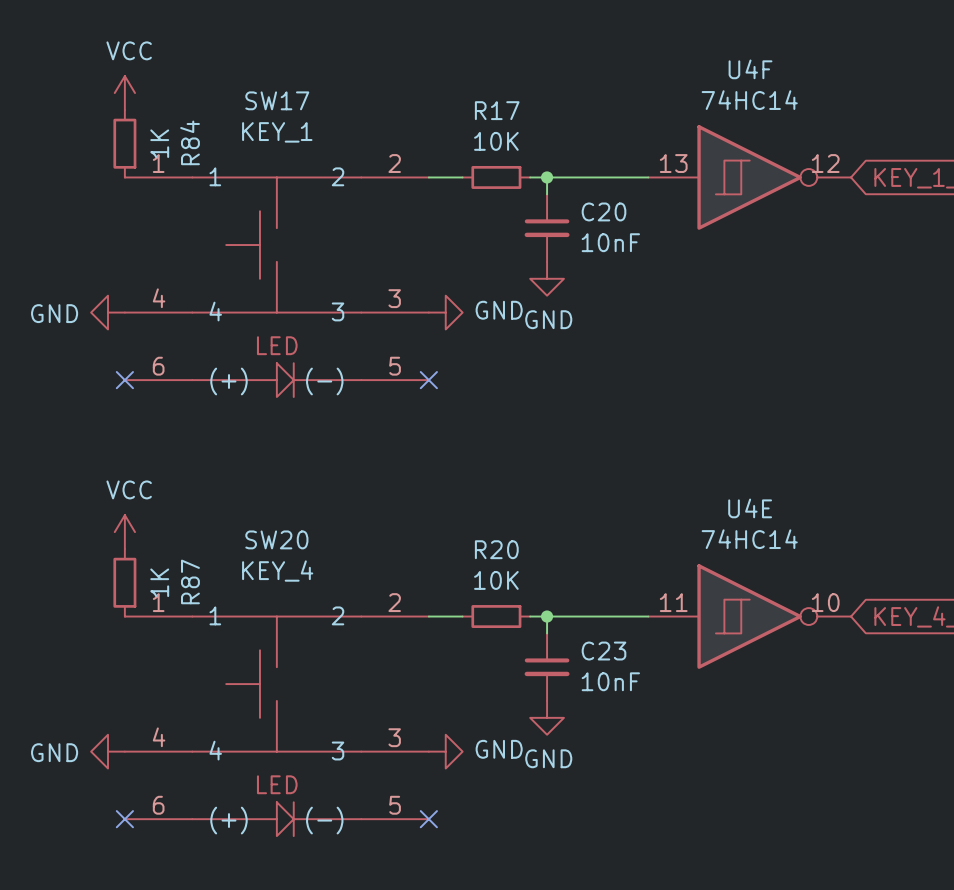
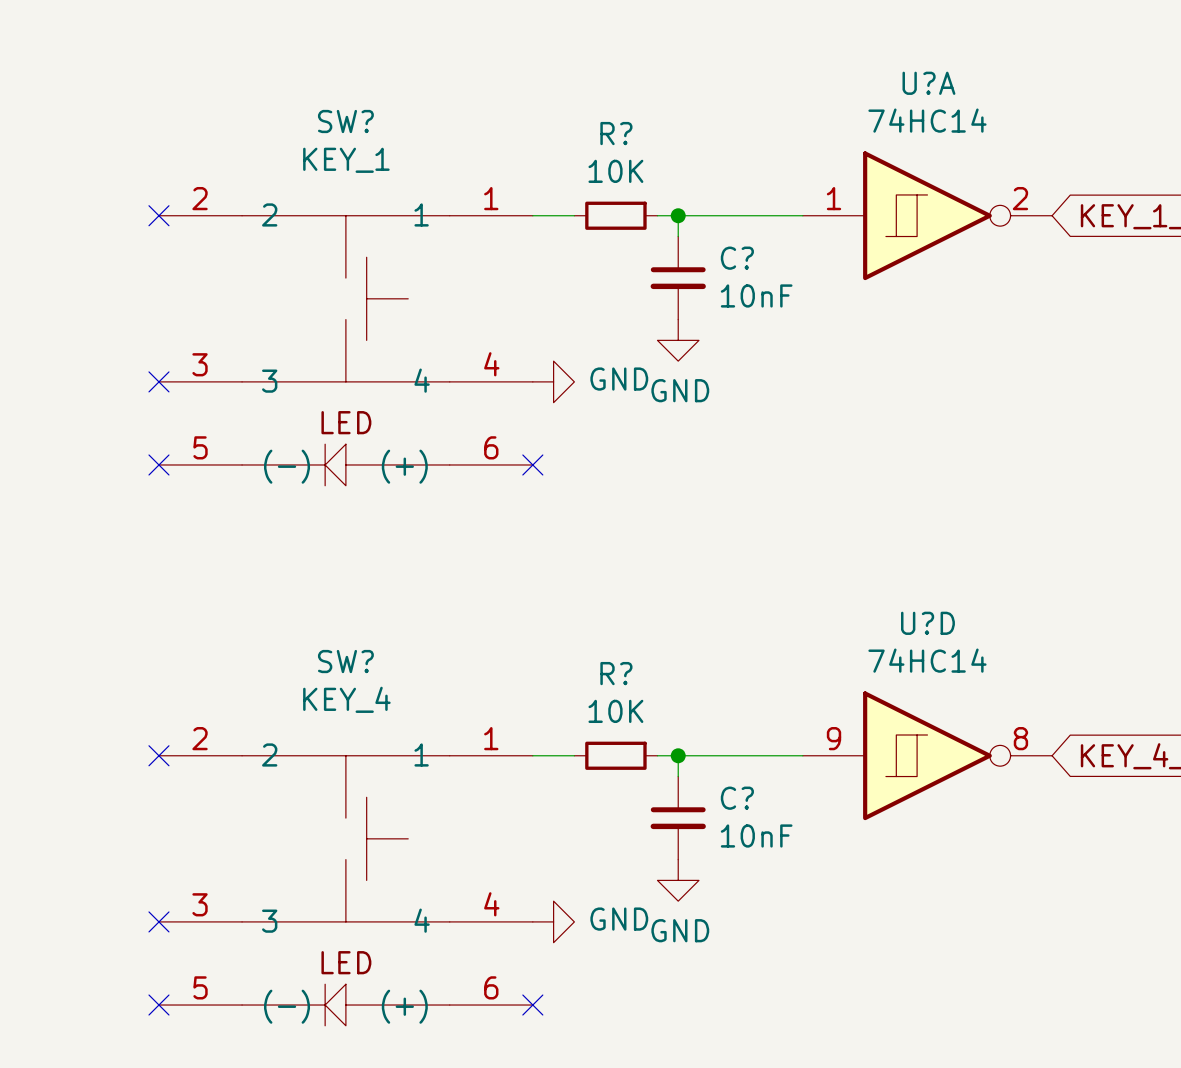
U4F name: U4F (750, 69) -> U?A (928, 83)
power symbol: VCC (124, 93) -> none
R17 name: R17 (497, 110) -> R? (616, 133)
R84: 1K (124, 143) -> none
U4F pin number: 13 (673, 163) -> 1 (834, 198)
U4F pin number: 12 (825, 163) -> 2 (1020, 198)
no-connect mark: none -> (158, 215)
C20 name: C20 (603, 211) -> C? (737, 258)
SW17: KEY_1 (276, 287) -> none
SW?: none -> KEY_1 (345, 350)
power symbol: GND (107, 312) -> none
no-connect mark: none -> (158, 381)
U4E name: U4E (750, 508) -> U?D (927, 623)
power symbol: VCC (124, 532) -> none
R20 name: R20 (496, 549) -> R? (616, 673)
R87: 1K (124, 582) -> none
U4E pin number: 11 (673, 602) -> 9 (834, 738)
U4E pin number: 10 (825, 602) -> 8 (1020, 738)
no-connect mark: none -> (158, 755)
C23 name: C23 (603, 651) -> C? (737, 798)
SW20: KEY_4 (276, 726) -> none
SW?: none -> KEY_4 (345, 890)
power symbol: GND (107, 751) -> none
no-connect mark: none -> (158, 921)

